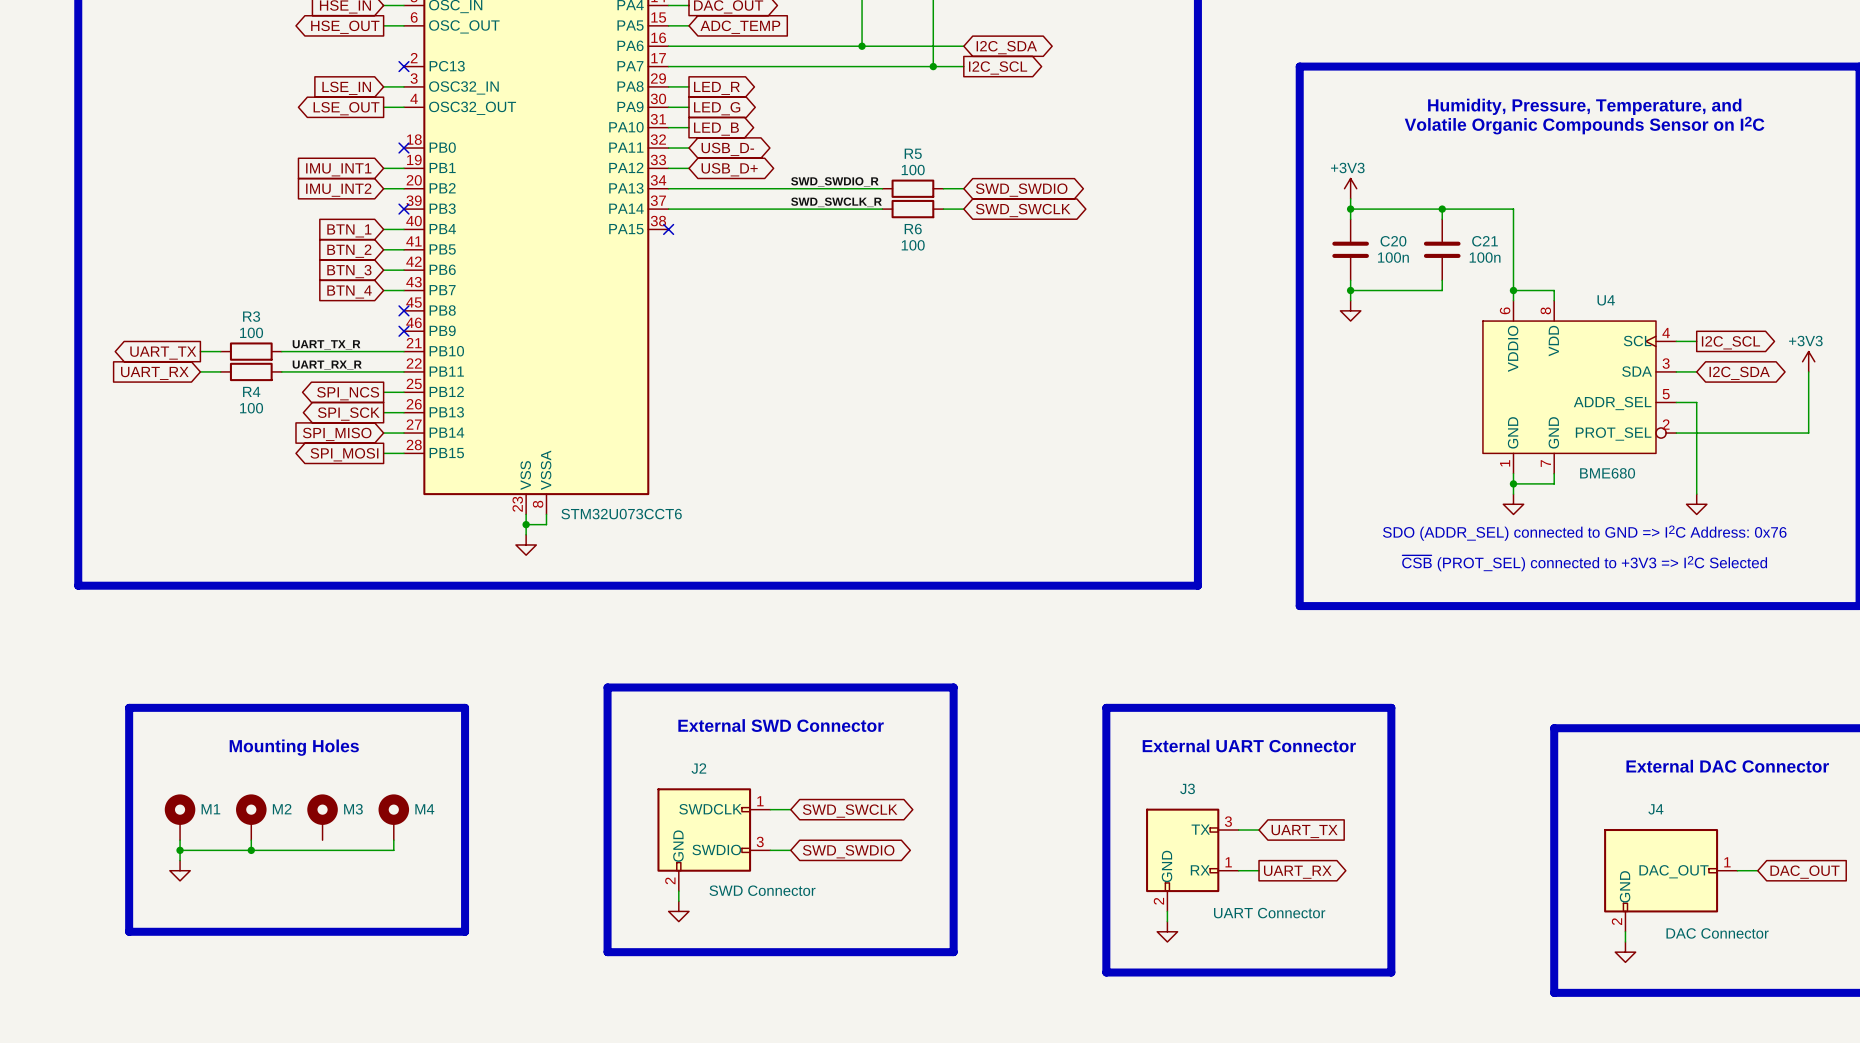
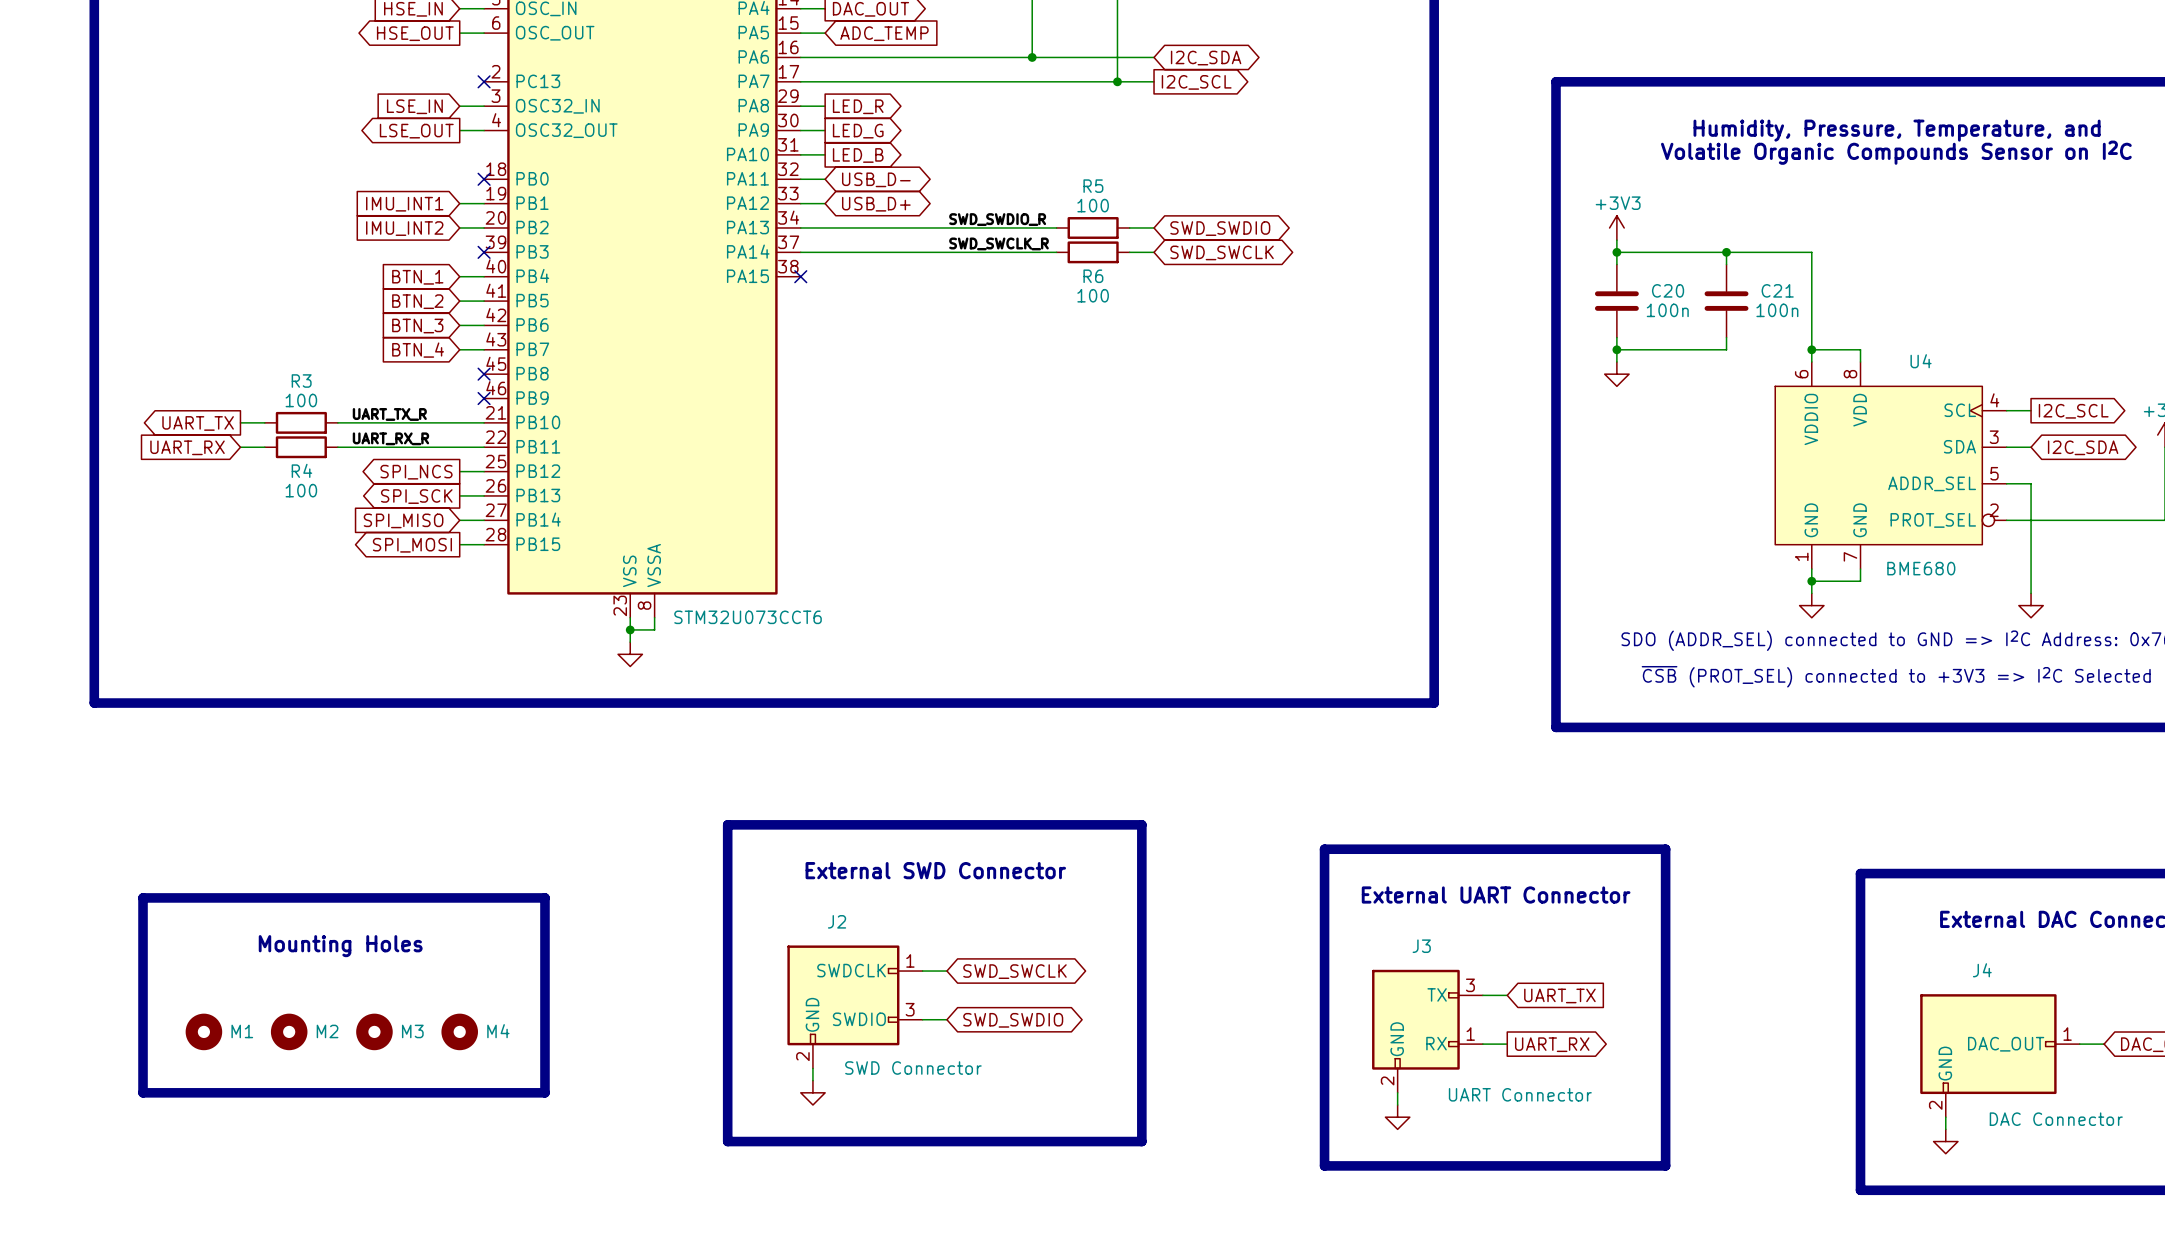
line: (129, 707) (465, 707) (465, 931) (129, 931) (129, 707) -> (143, 897) (143, 1092) (544, 1092) (544, 897) (143, 897)
text position: Mounting Holes (294, 747) -> Mounting Holes (340, 946)
M1 symbol: [164, 794, 196, 841] -> [185, 1013, 223, 1051]
M2 symbol: [236, 794, 267, 841] -> [270, 1013, 308, 1051]
M3 symbol: [307, 794, 338, 841] -> [356, 1013, 393, 1051]
M4 symbol: [378, 794, 410, 841] -> [441, 1013, 478, 1051]
wire: (251, 840) (251, 850) -> none
wire: (393, 840) (393, 850) (180, 850) -> none
junction: (180, 850) -> none
junction: (251, 850) -> none
power symbol: (180, 870) -> none

